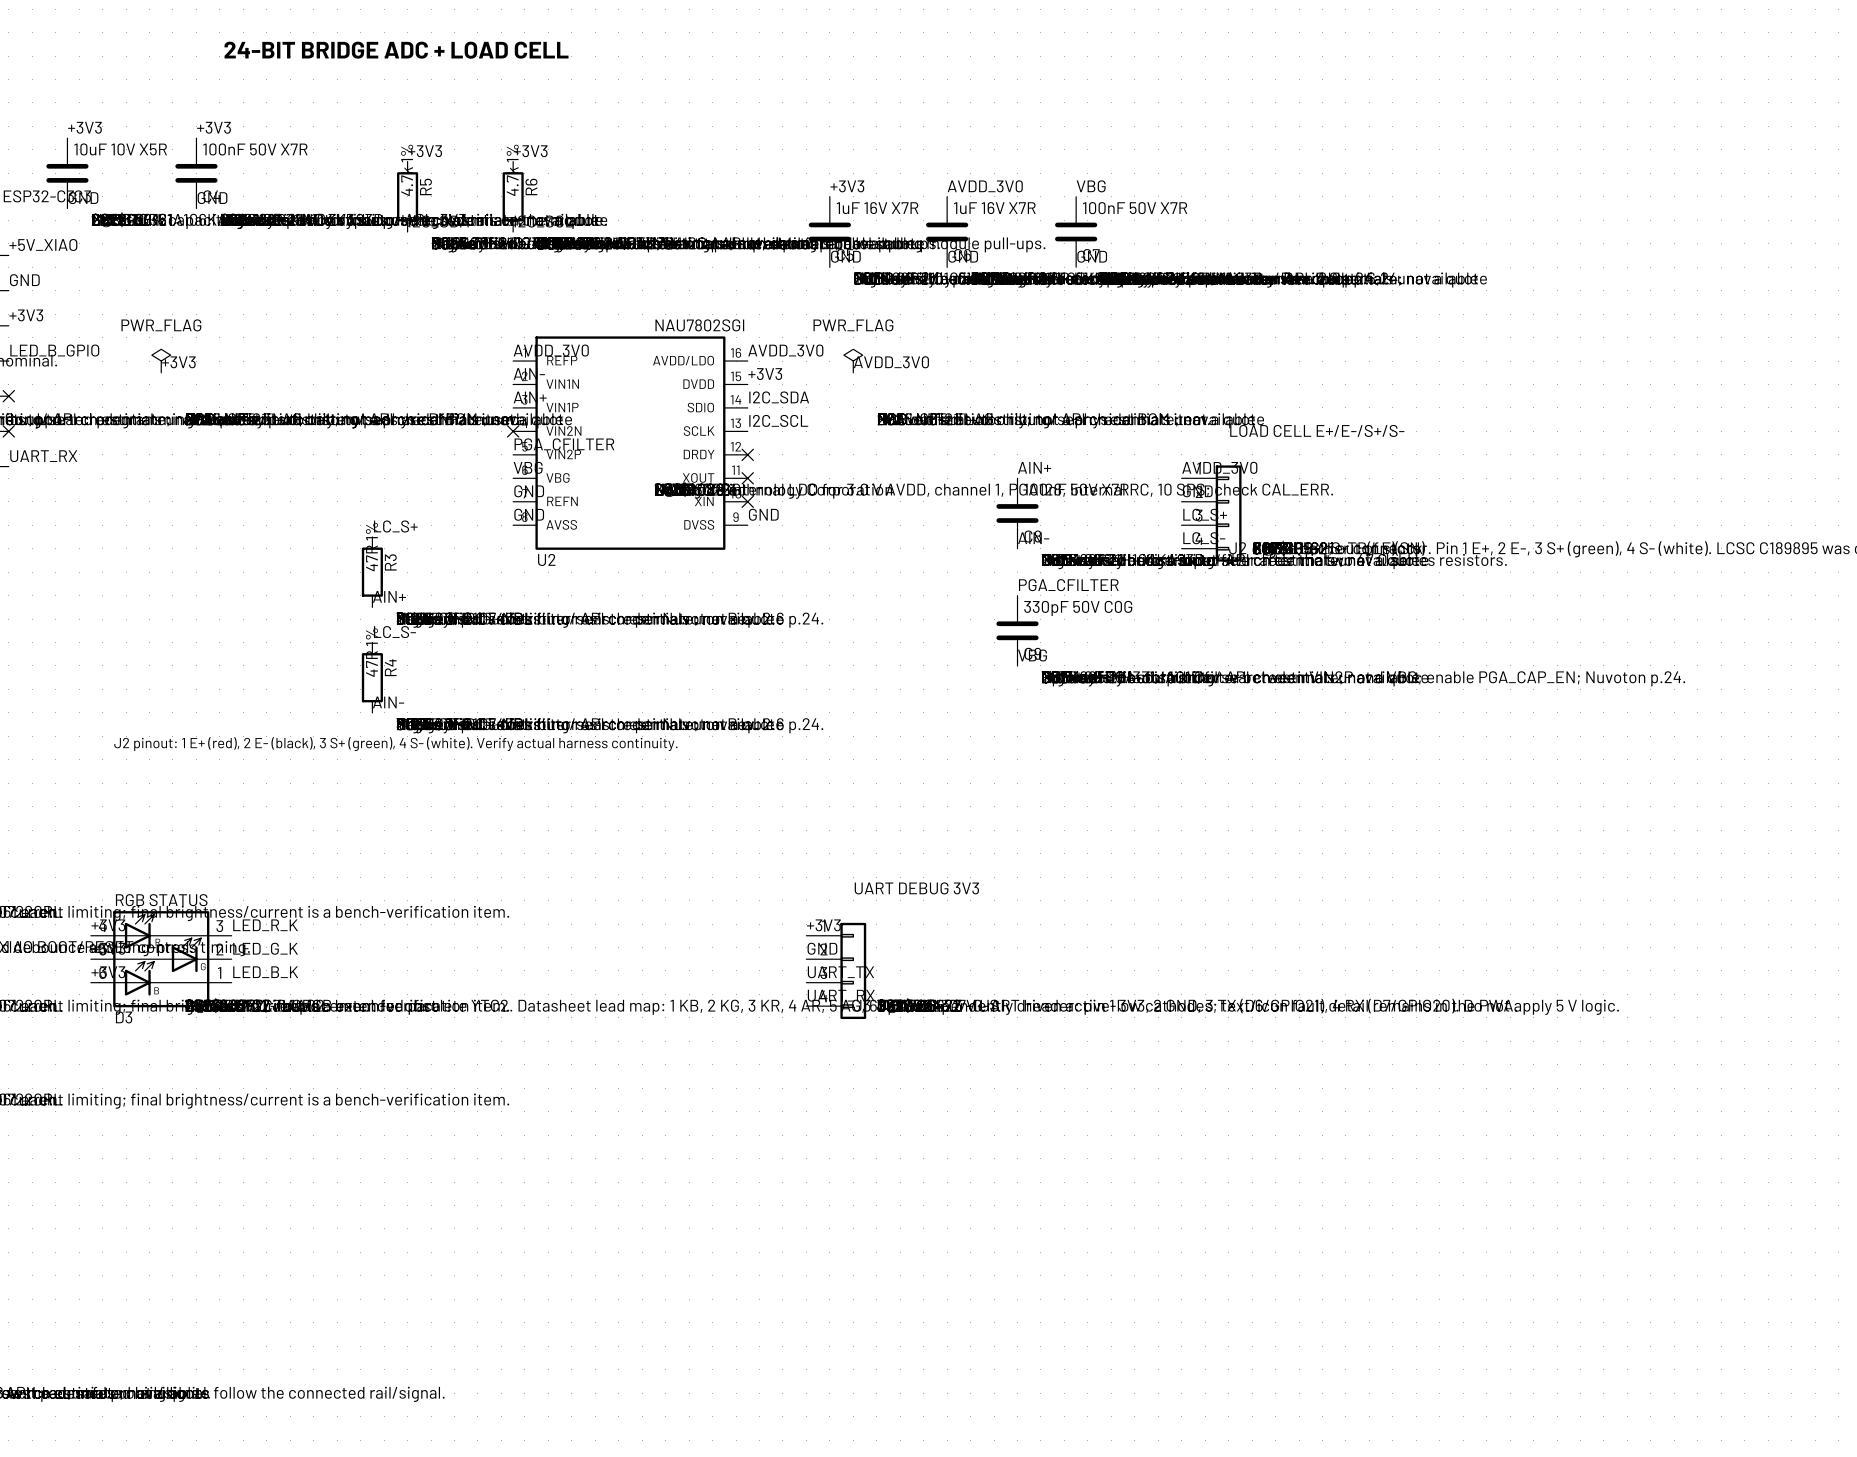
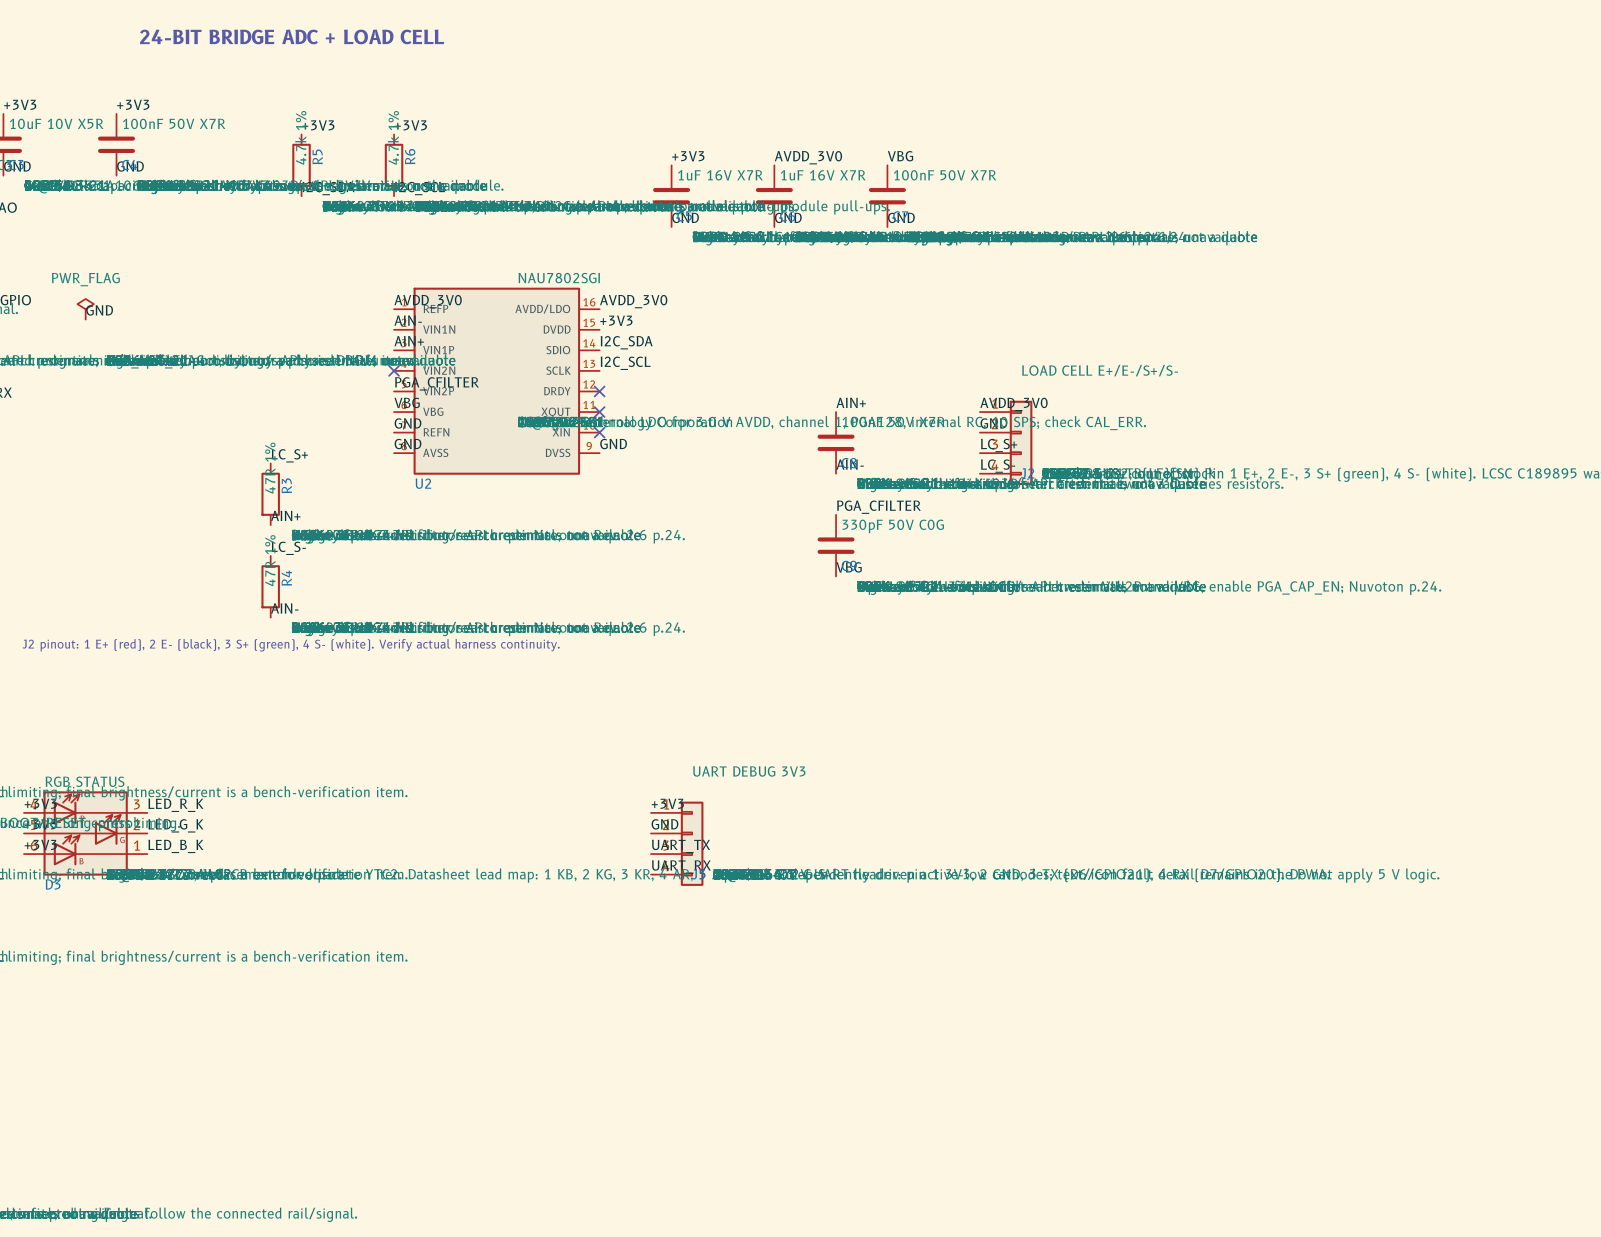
power symbol: PWR_FLAG (853, 361) -> none
label: +3V3 (178, 362) -> GND (99, 310)
label: AVDD_3V0 (891, 362) -> none

